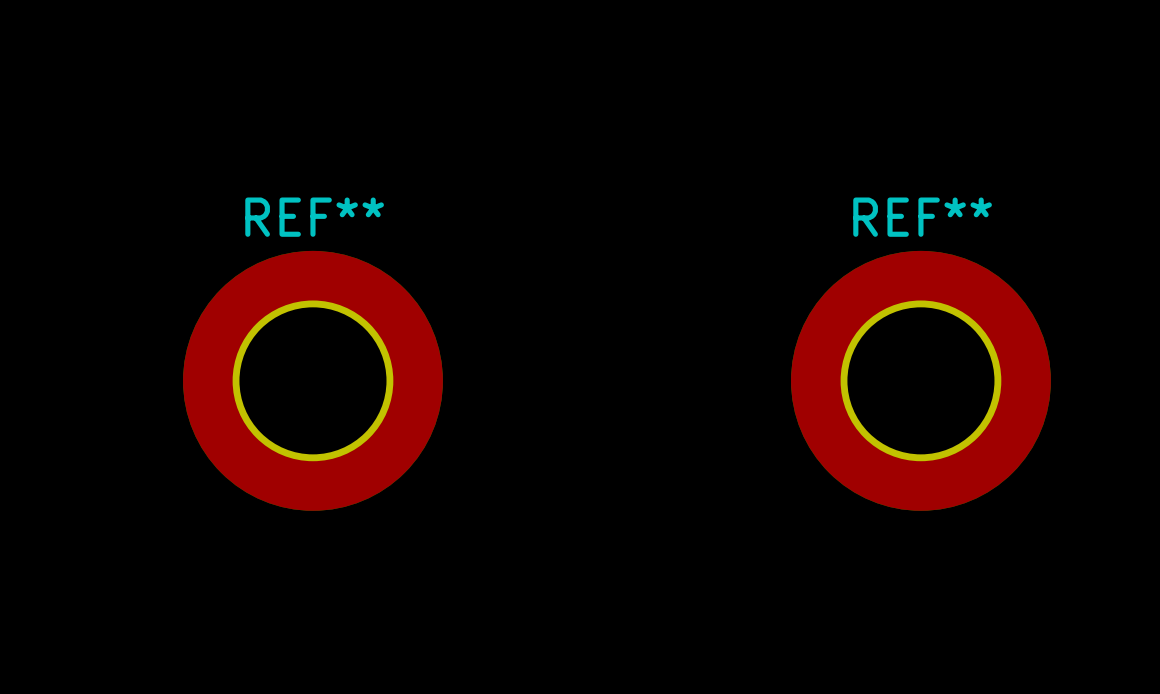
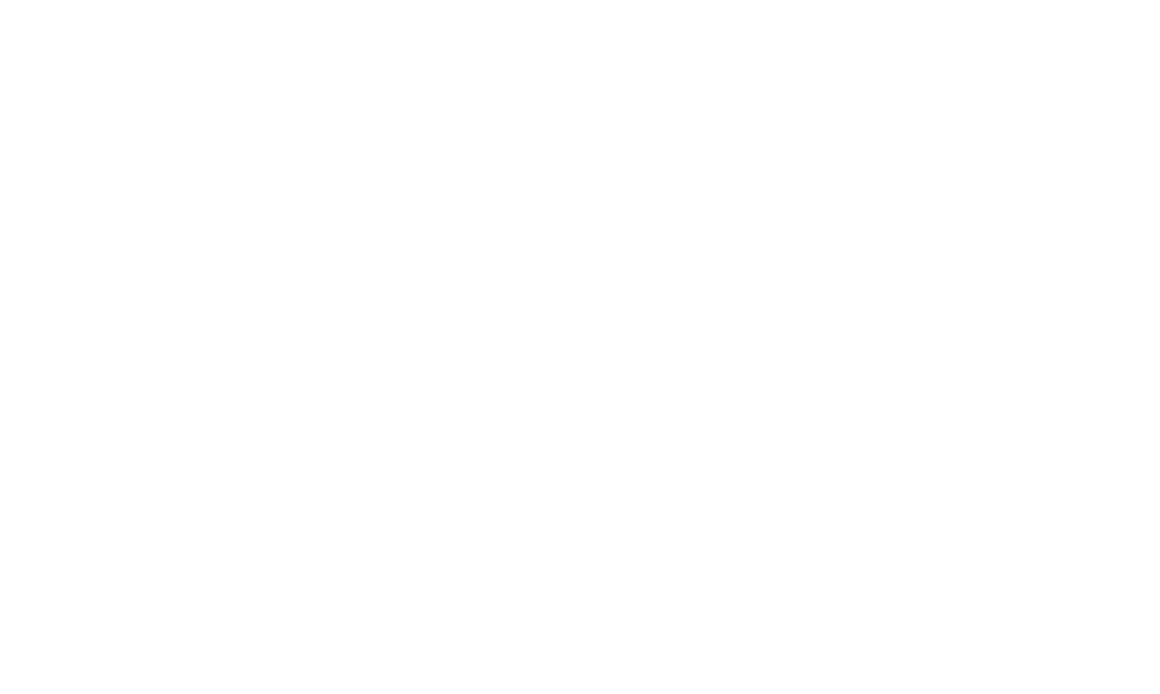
REF**: (312, 380) -> none
REF**: (920, 380) -> none

